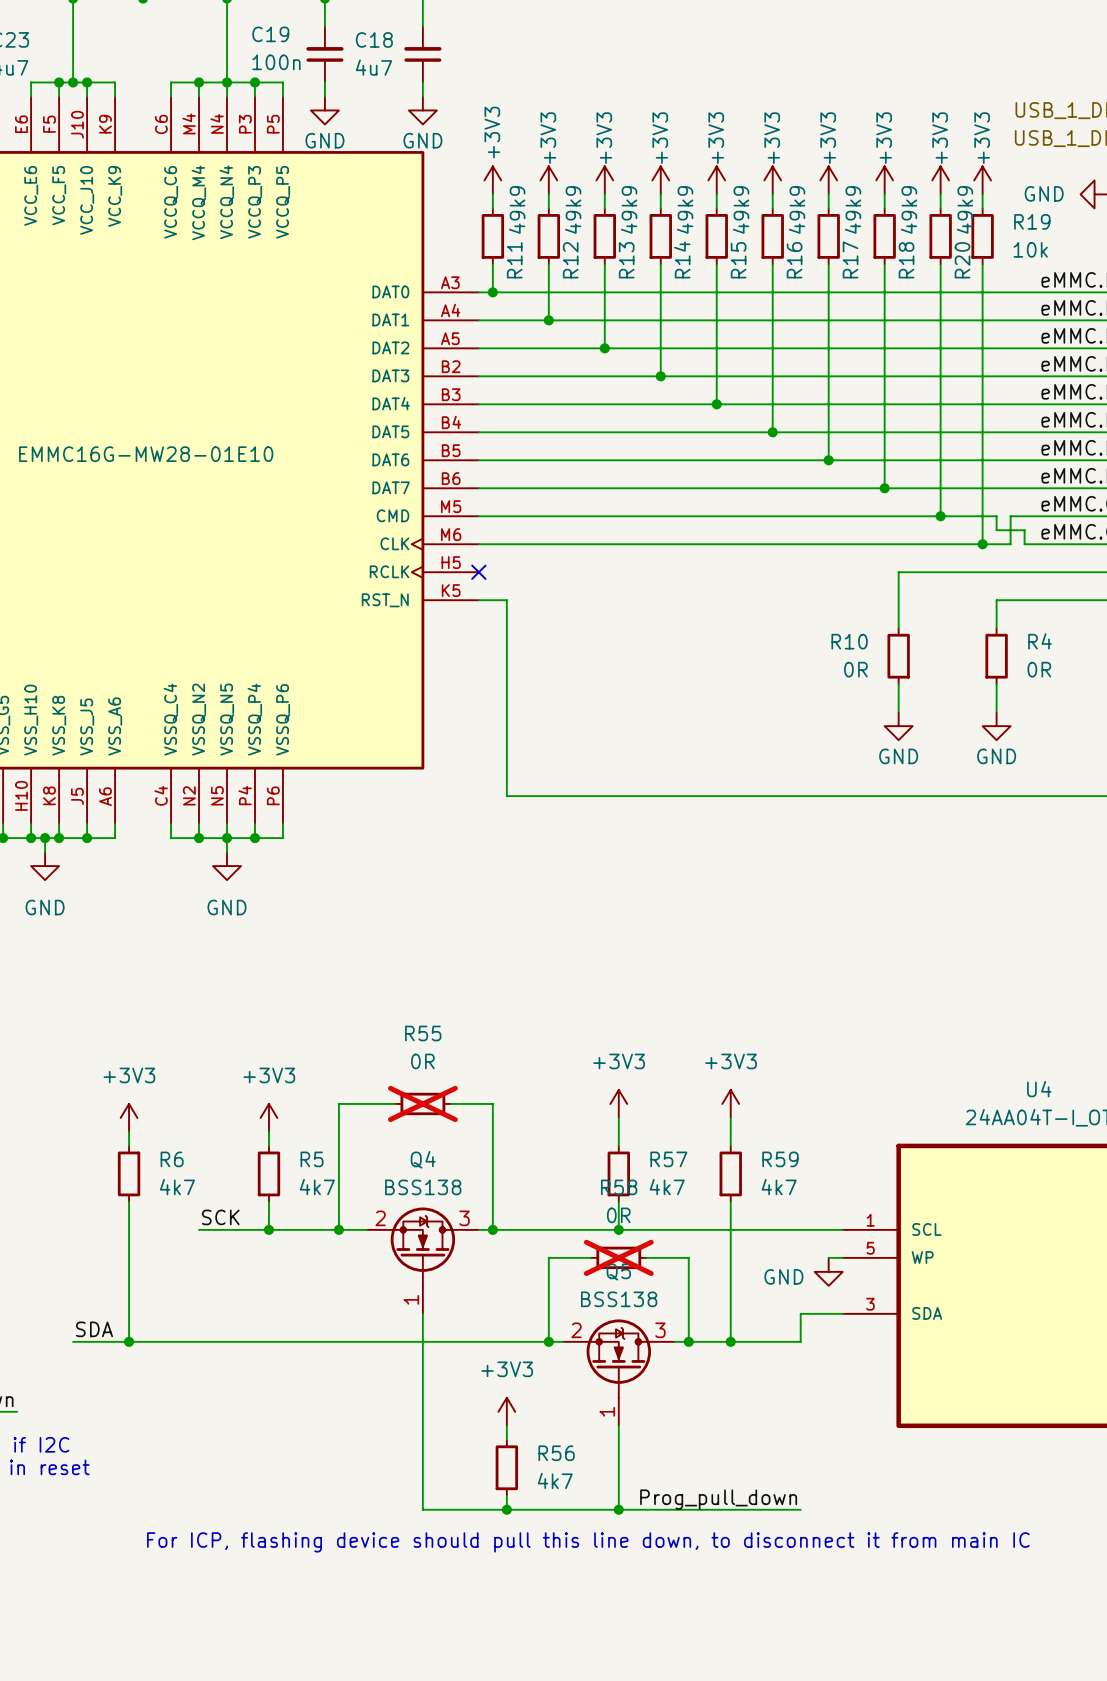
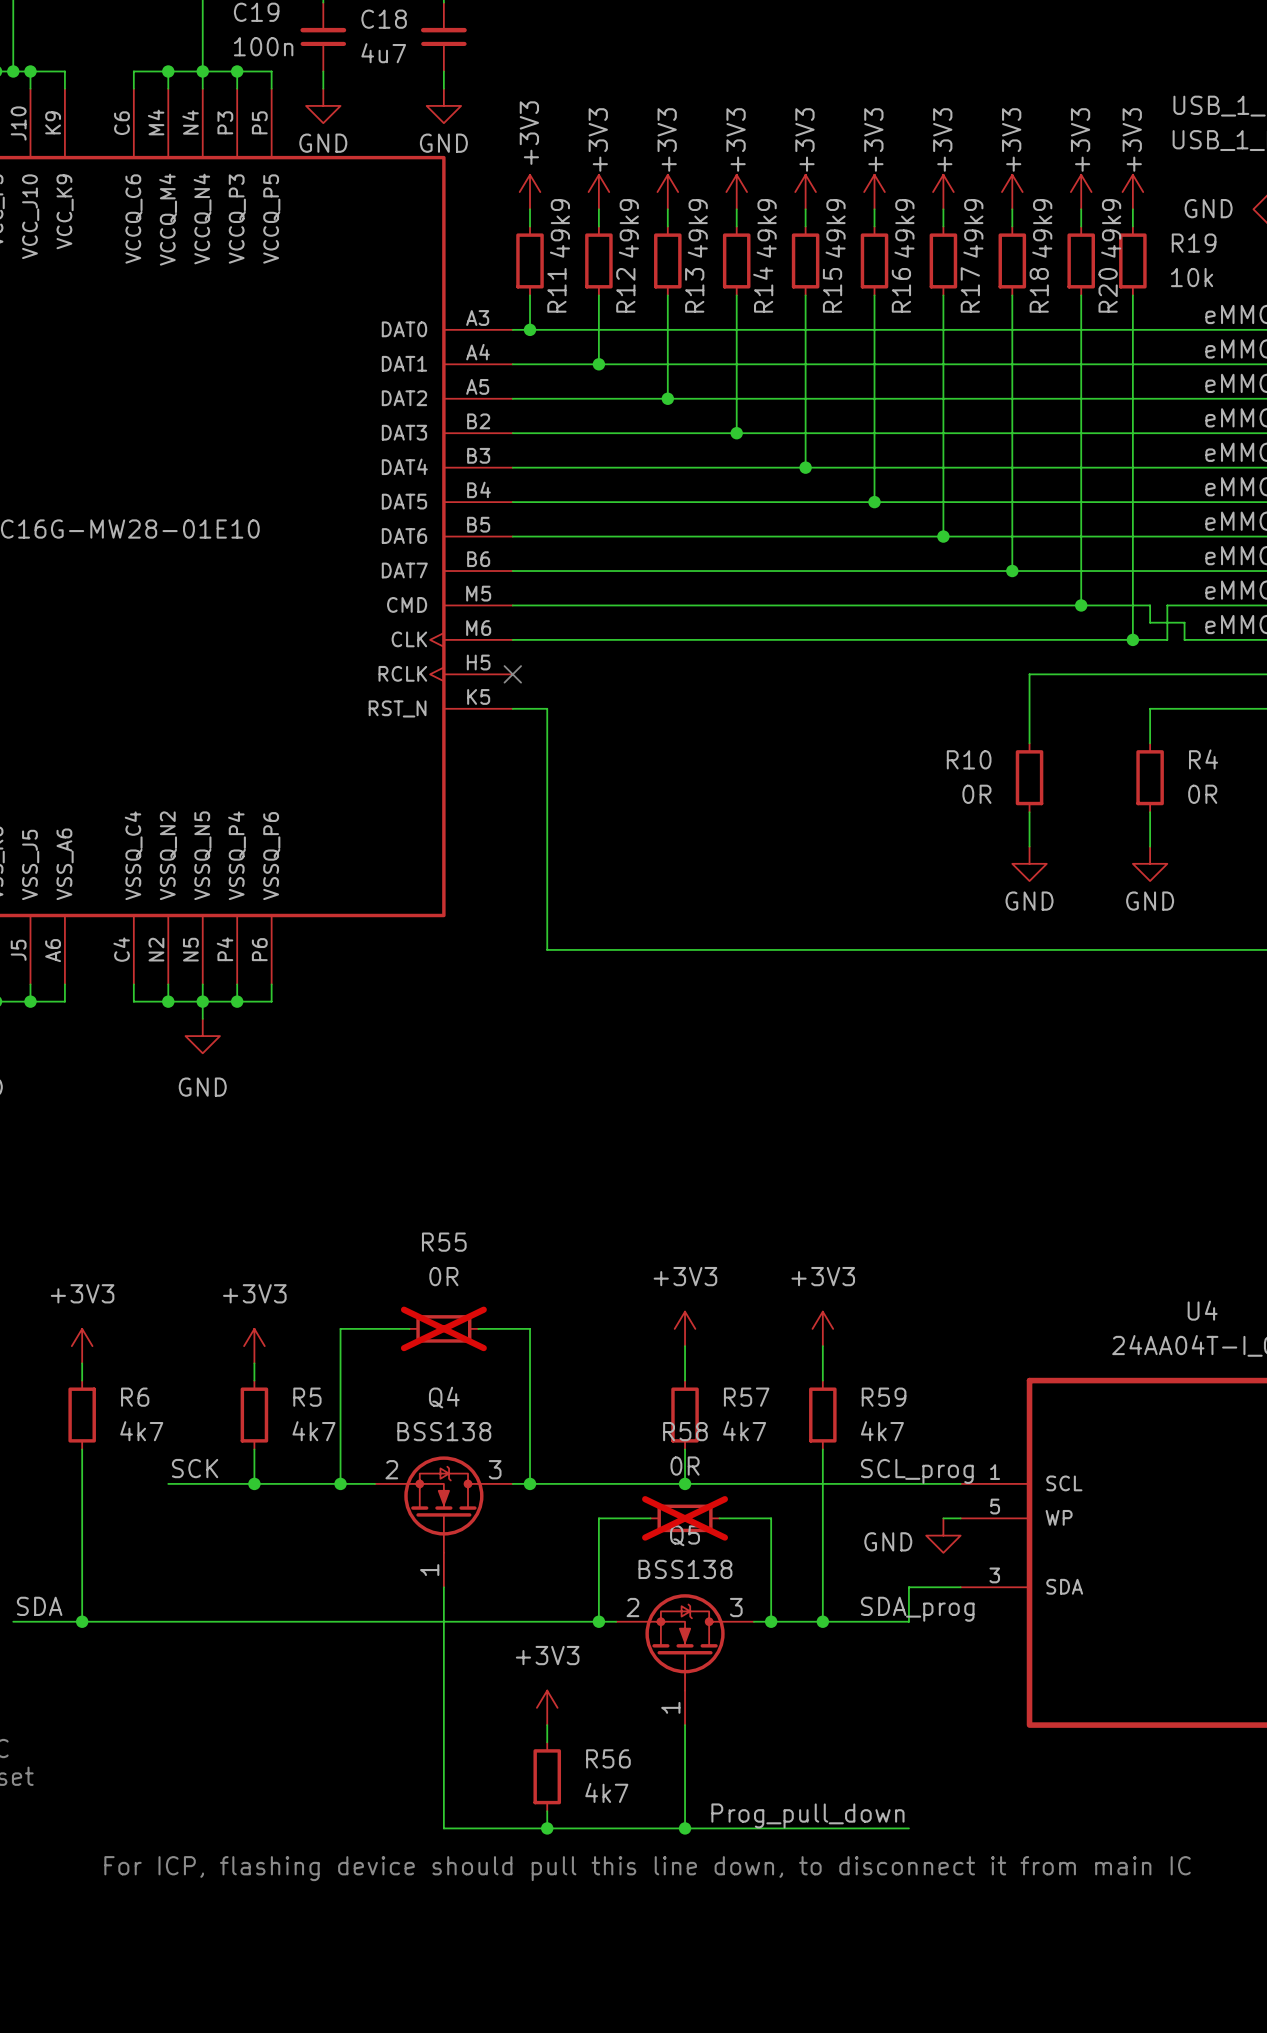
label: none -> SCL_prog (917, 1471)
label: none -> SDA_prog (917, 1609)

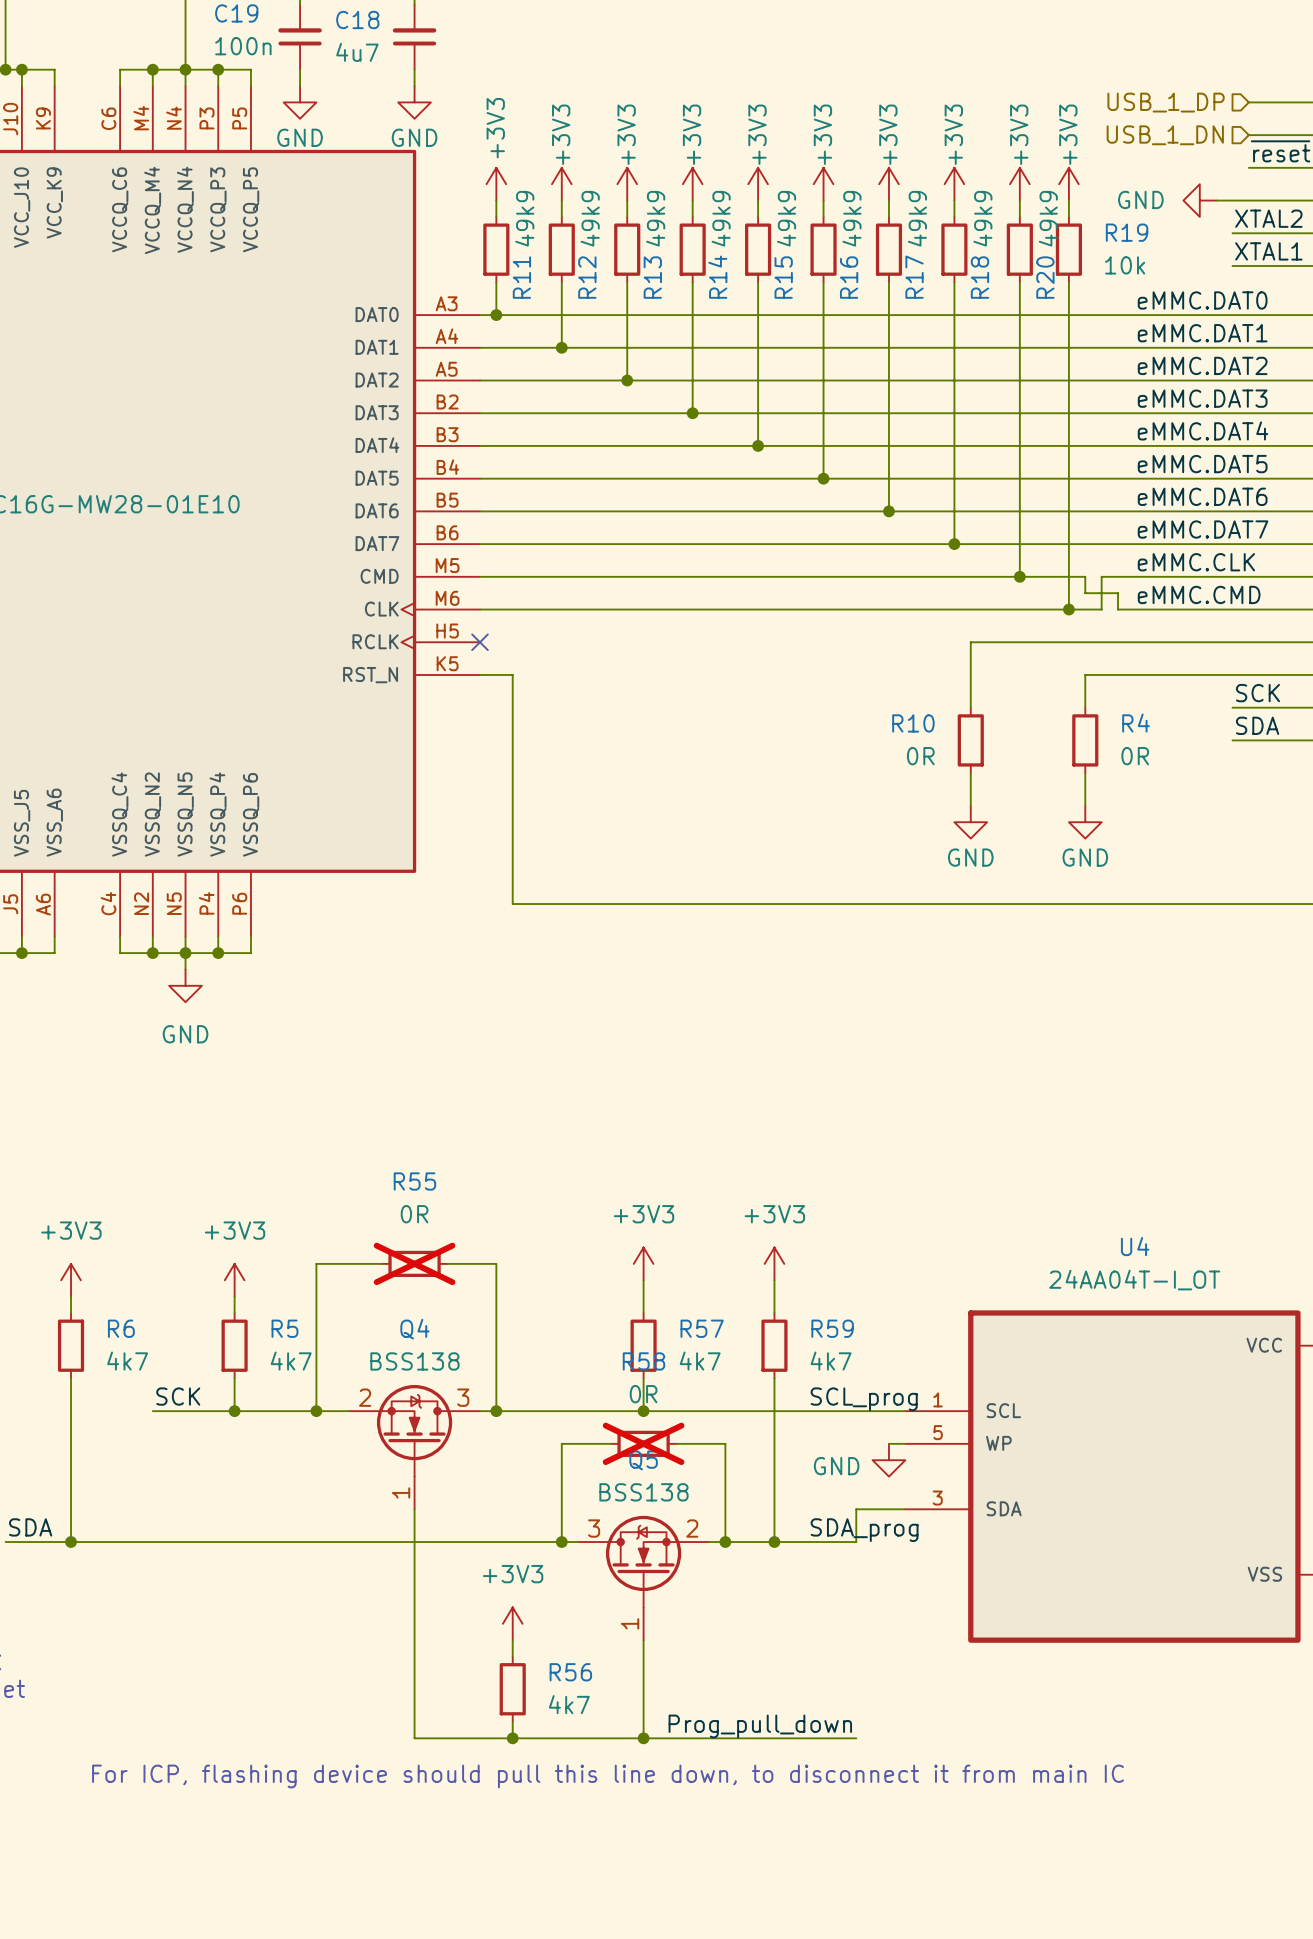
Q5 flip: as is (685, 1642) -> left-right (643, 1561)

